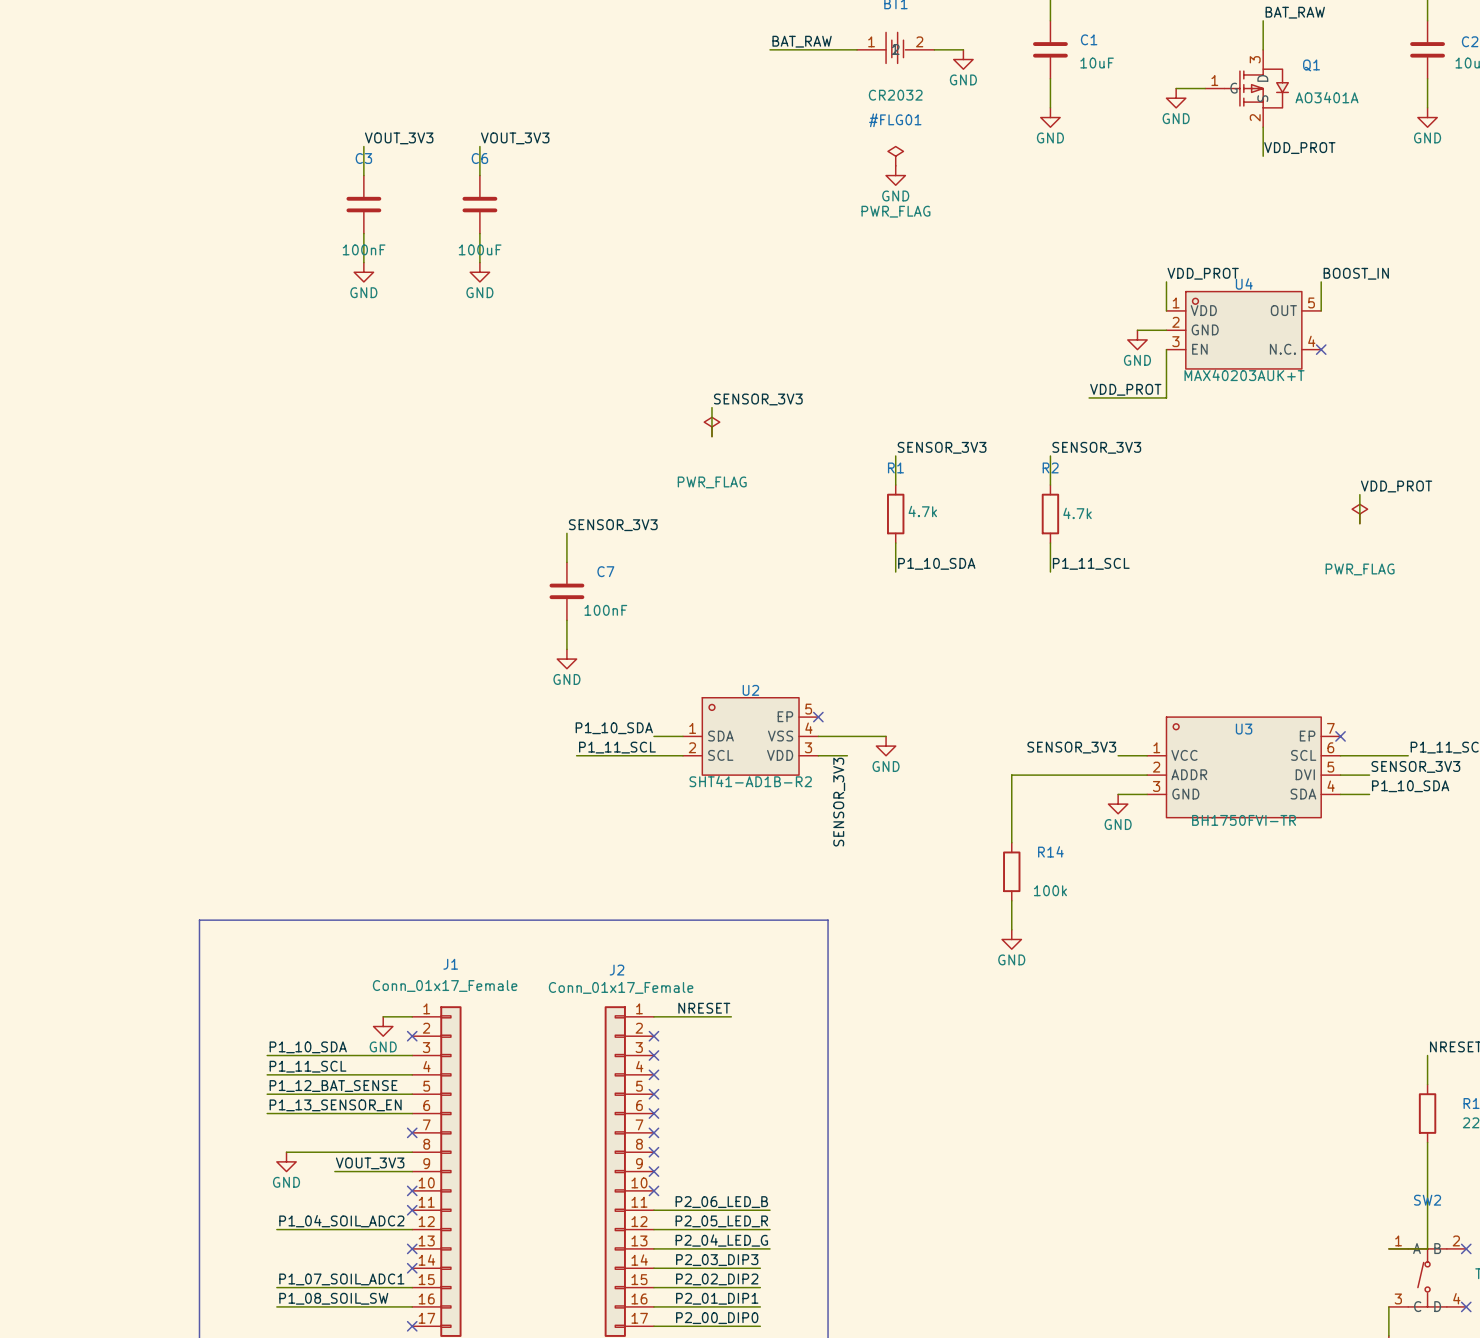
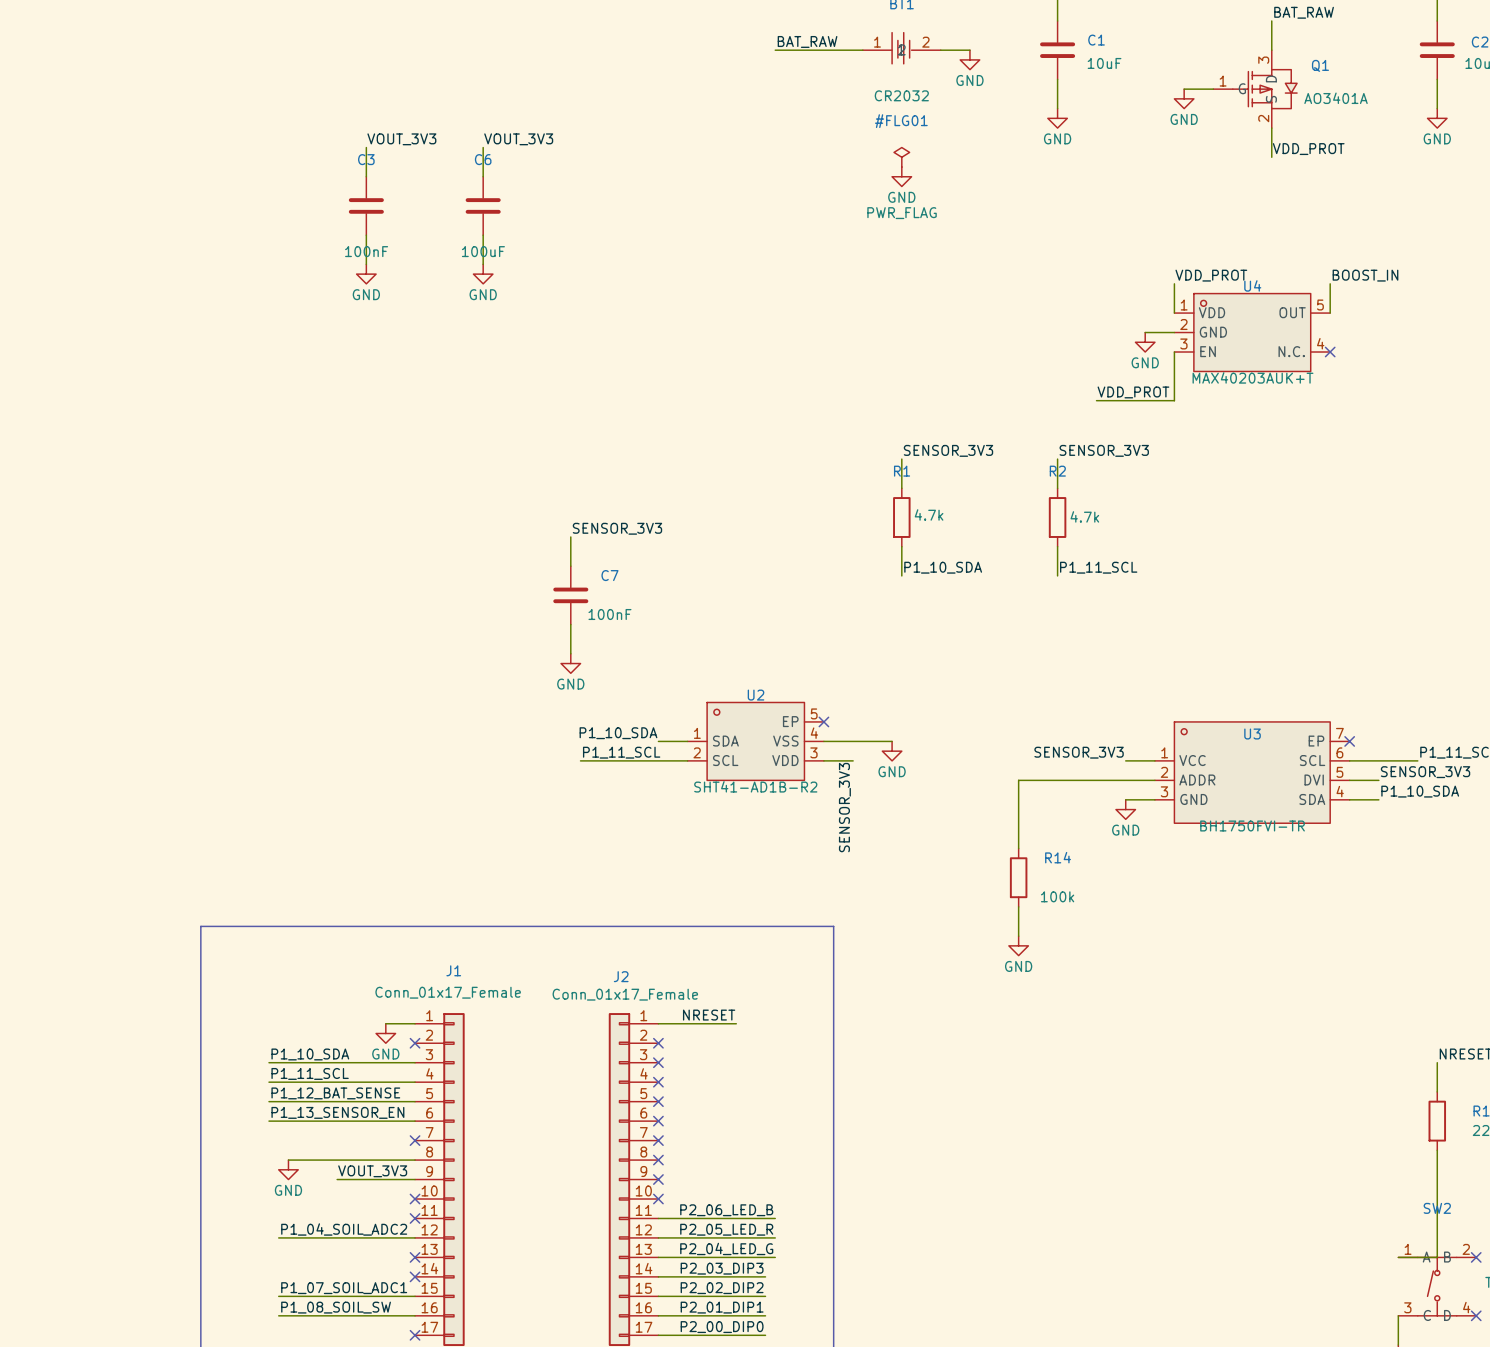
label: SENSOR_3V3 (758, 399) -> none
wire: (711, 407) (711, 436) -> none
power symbol: PWR_FLAG (711, 426) -> none
label: VDD_PROT (1396, 486) -> none
wire: (1359, 494) (1359, 523) -> none
power symbol: PWR_FLAG (1359, 514) -> none

